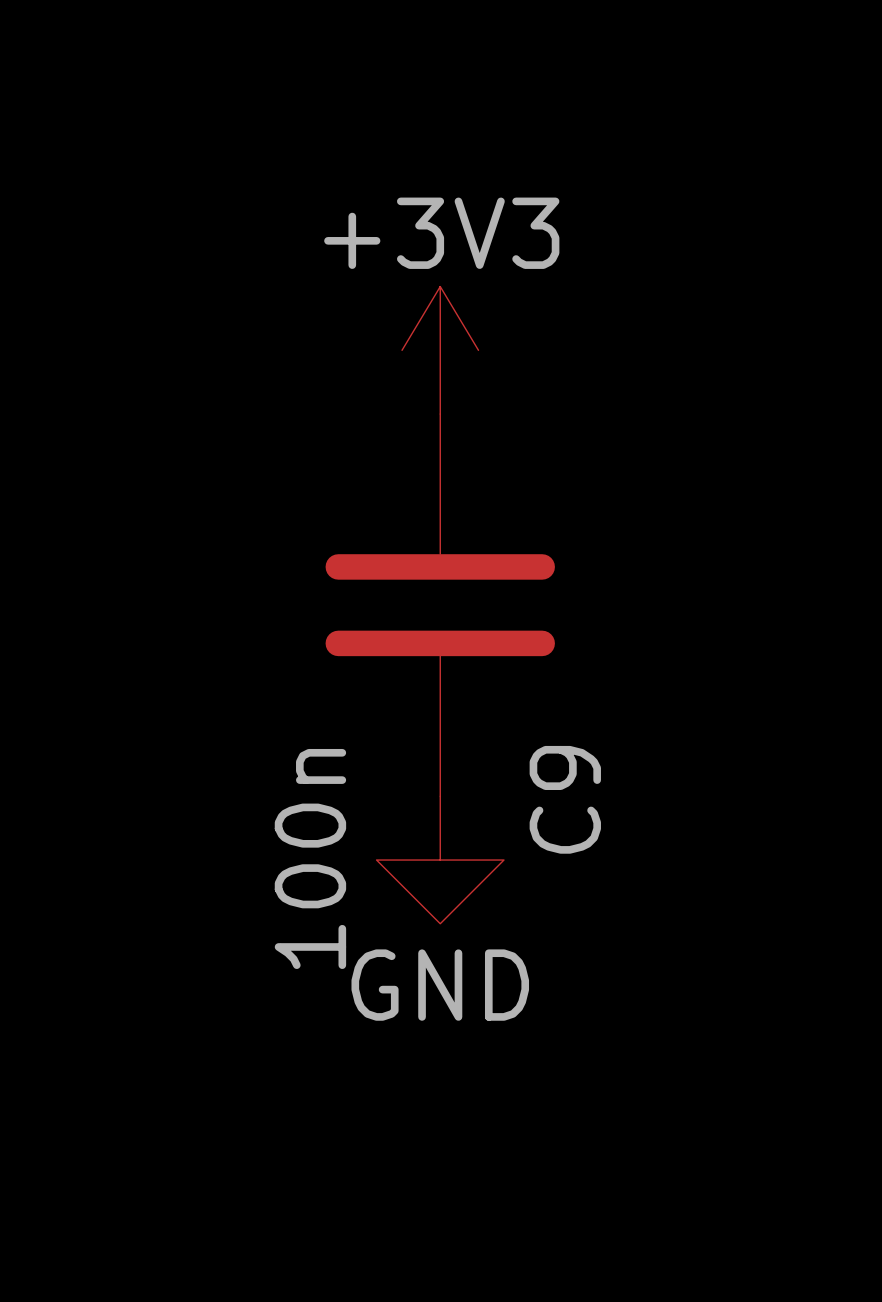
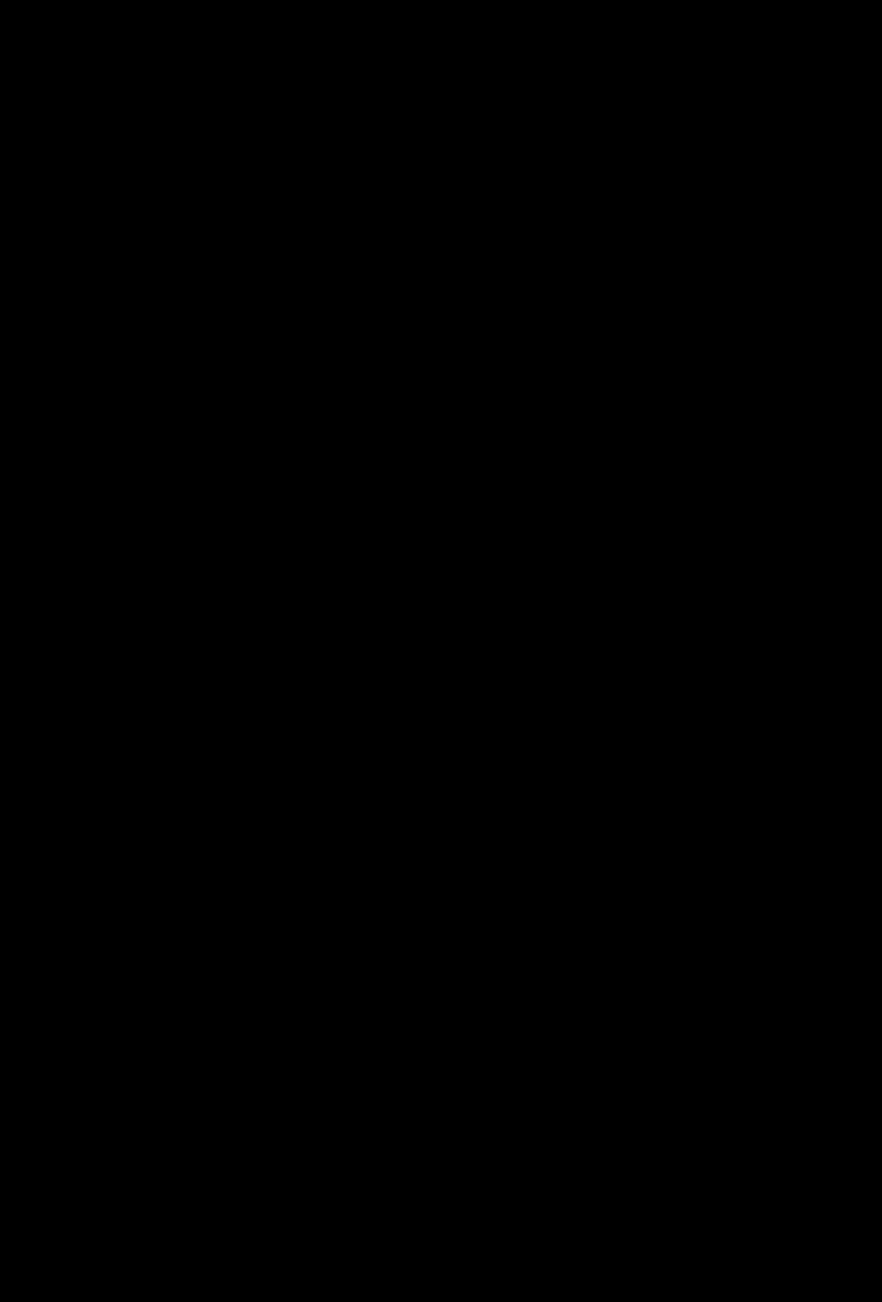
power symbol: +3V3 (440, 350) -> none
C9: 100n (440, 605) -> none
power symbol: GND (440, 860) -> none

